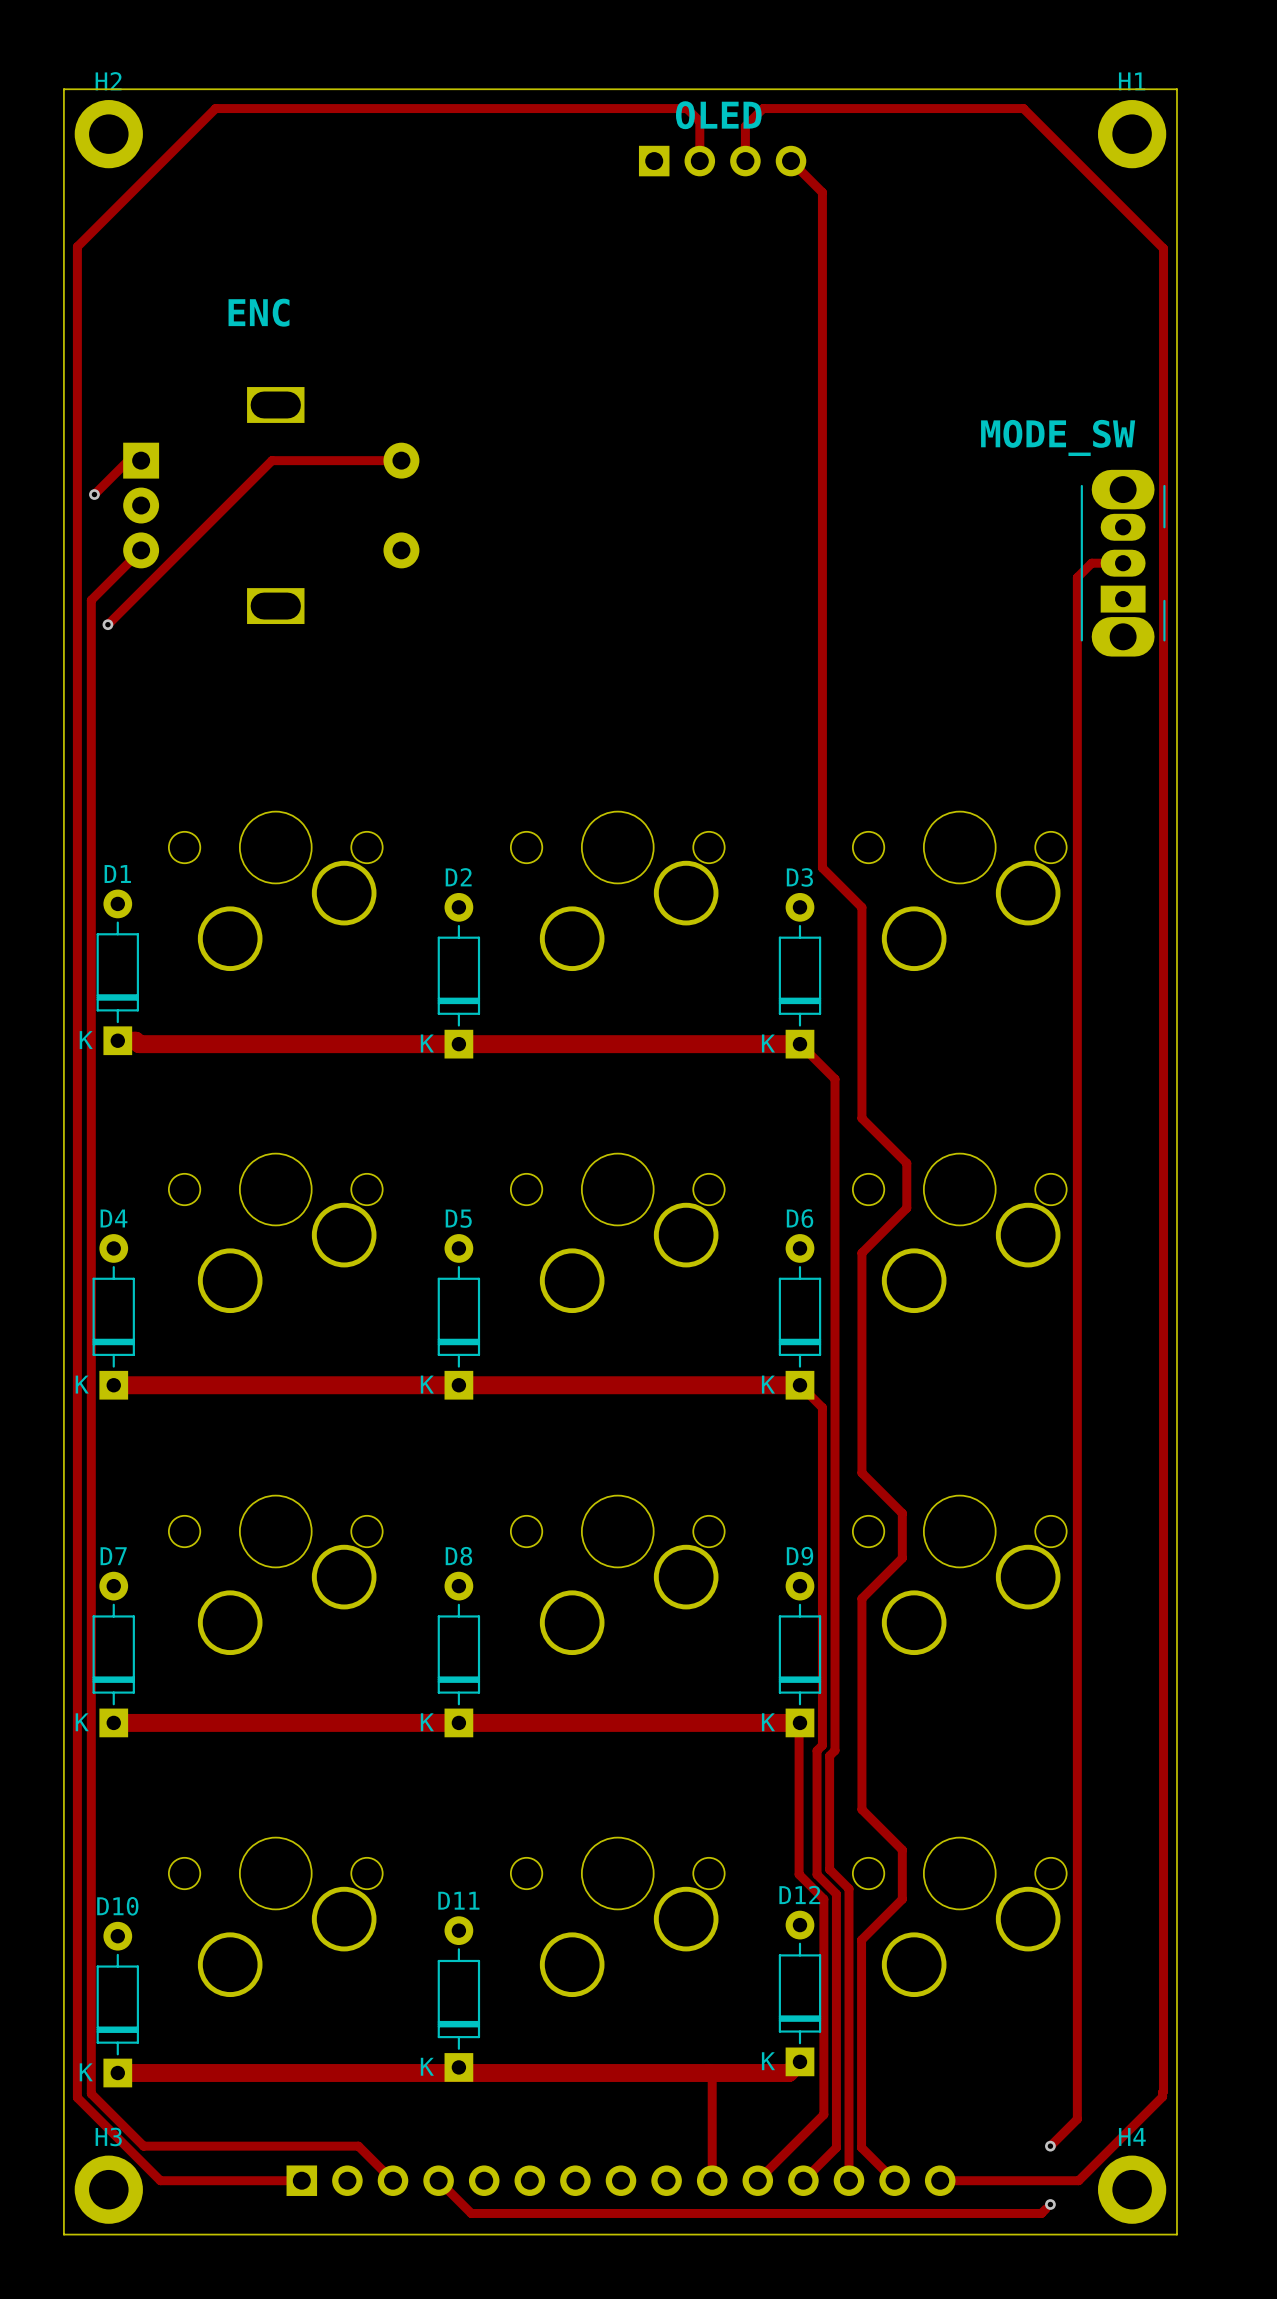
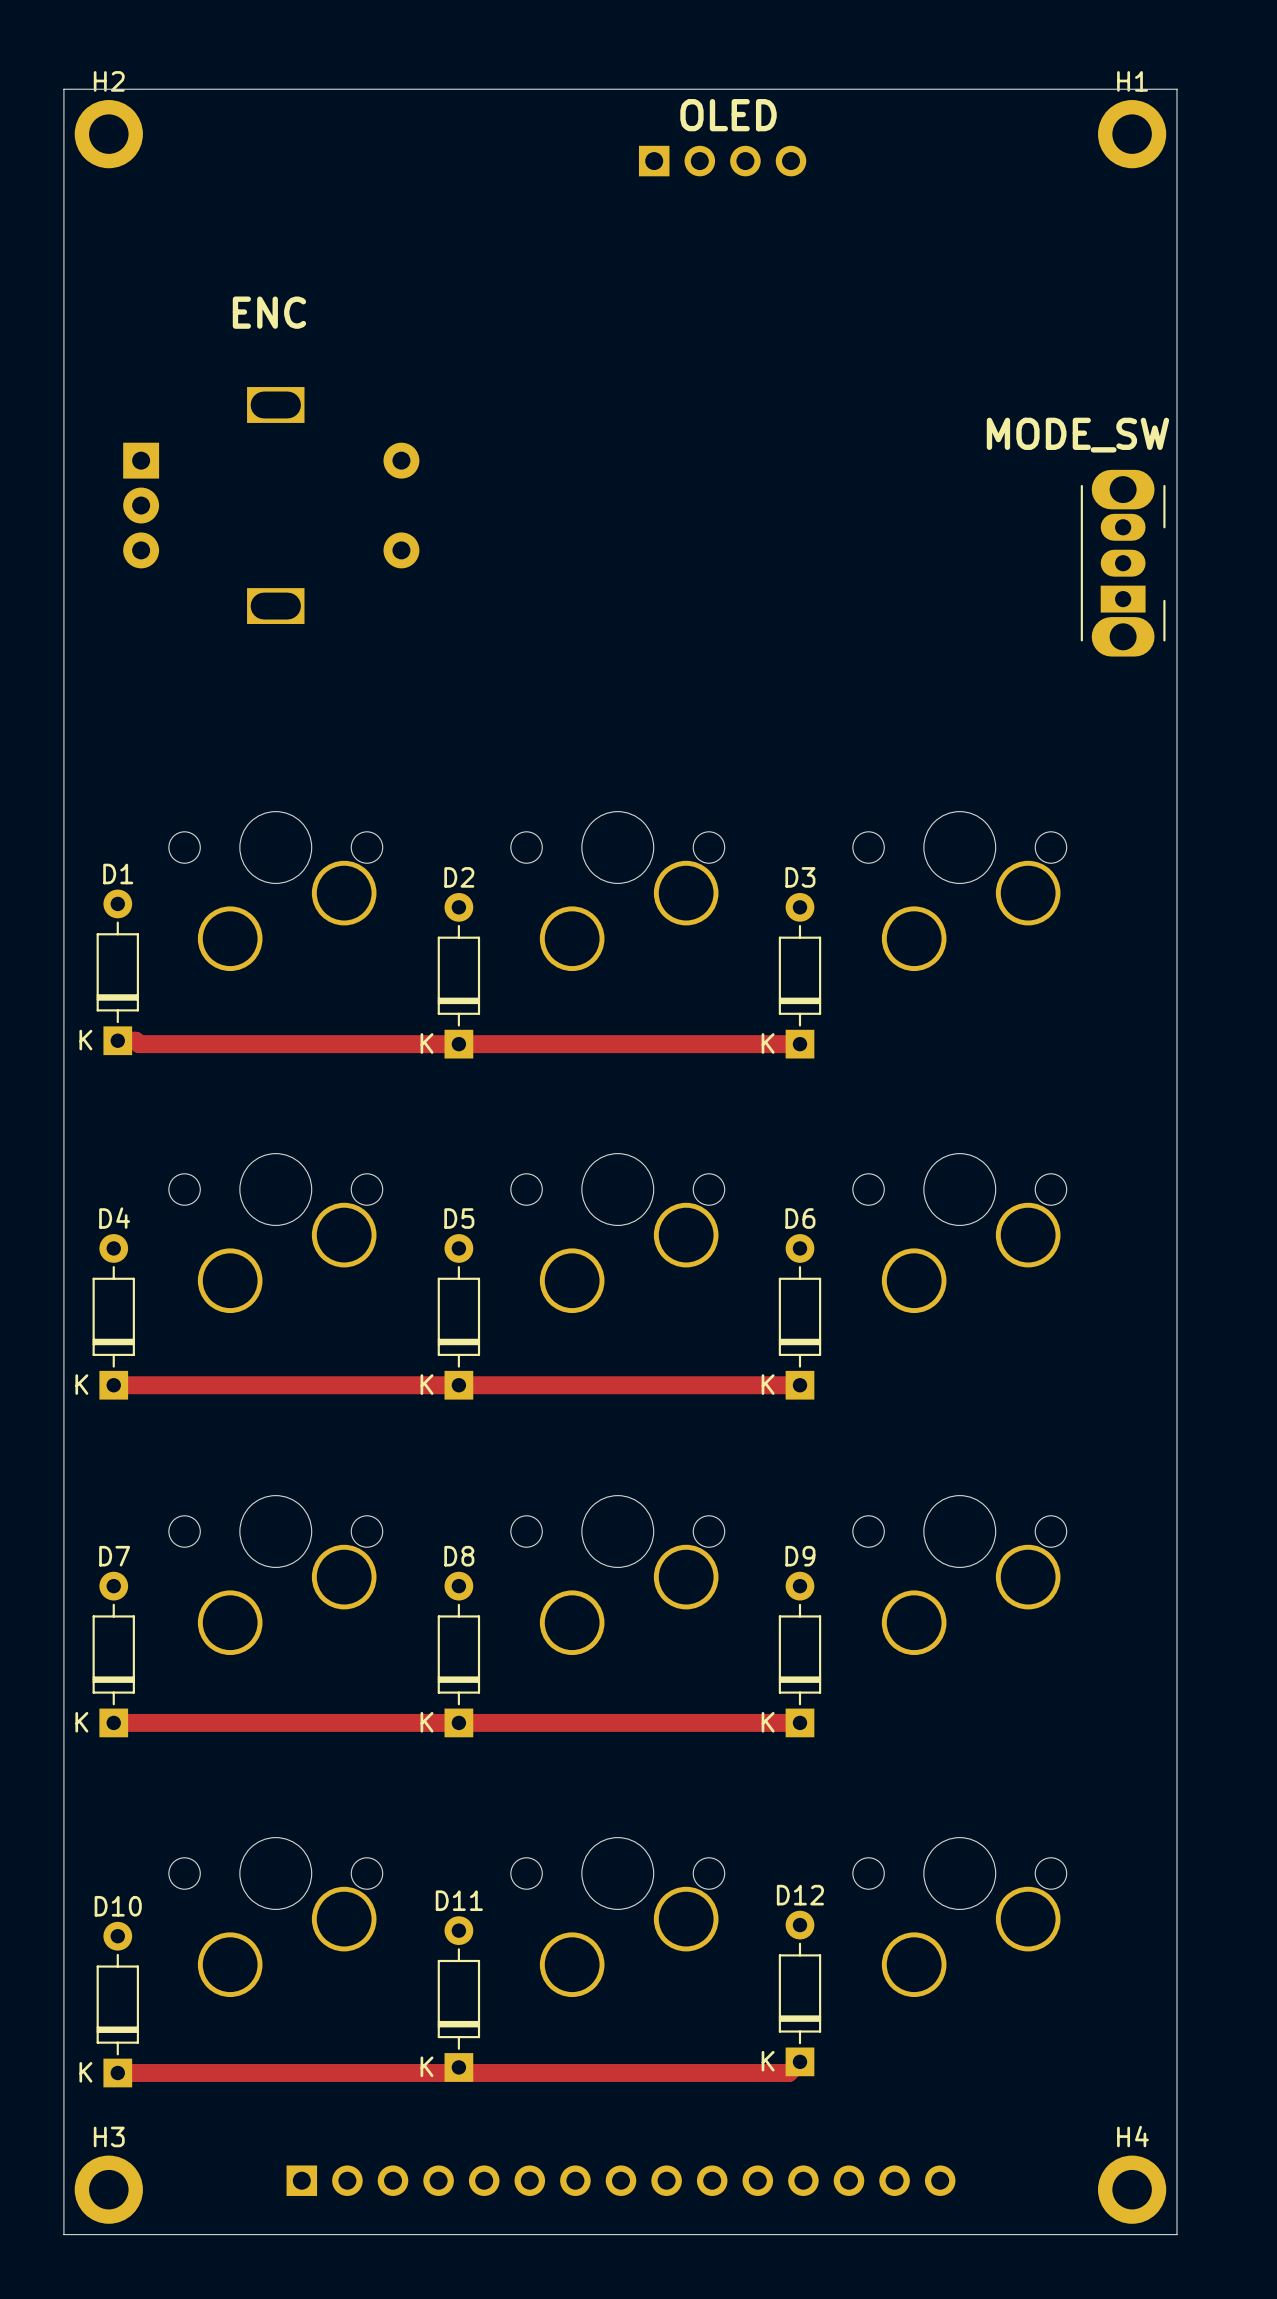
track: (745, 161) (745, 126) (763, 108) (1023, 108) (1163, 248) (1163, 2091) (1162, 2096) (1078, 2180) (940, 2180) -> none
track: (791, 161) (822, 192) (822, 867) (861, 907) (861, 1118) (906, 1163) (906, 1208) (861, 1253) (861, 1472) (902, 1513) (902, 1558) (861, 1598) (861, 1809) (902, 1849) (902, 1899) (861, 1940) (861, 2147) (894, 2180) -> none
track: (699, 162) (699, 121) (686, 108) (215, 108) (77, 246) (77, 2097) (160, 2180) (301, 2180) -> none
track: (141, 460) (128, 460) (94, 494) -> none
track: (401, 460) (271, 460) (107, 624) -> none
via: (94, 494) -> none
track: (141, 550) (91, 600) (91, 2093) (143, 2146) (358, 2146) (393, 2180) -> none
track: (1123, 563) (1091, 563) (1077, 577) (1077, 2119) (1050, 2146) -> none
via: (107, 624) -> none
track: (799, 1044) (835, 1079) (835, 1750) (829, 1755) (829, 1869) (849, 1888) (849, 2180) -> none
track: (799, 1385) (822, 1407) (822, 1745) (817, 1750) (817, 1874) (836, 1894) (836, 2147) (803, 2180) -> none
track: (799, 1723) (799, 1874) (823, 1899) (823, 2114) (757, 2180) -> none
track: (709, 2073) (712, 2075) (712, 2180) -> none
via: (1050, 2146) -> none
track: (438, 2180) (471, 2213) (1041, 2213) (1045, 2208) -> none
via: (1050, 2204) -> none

